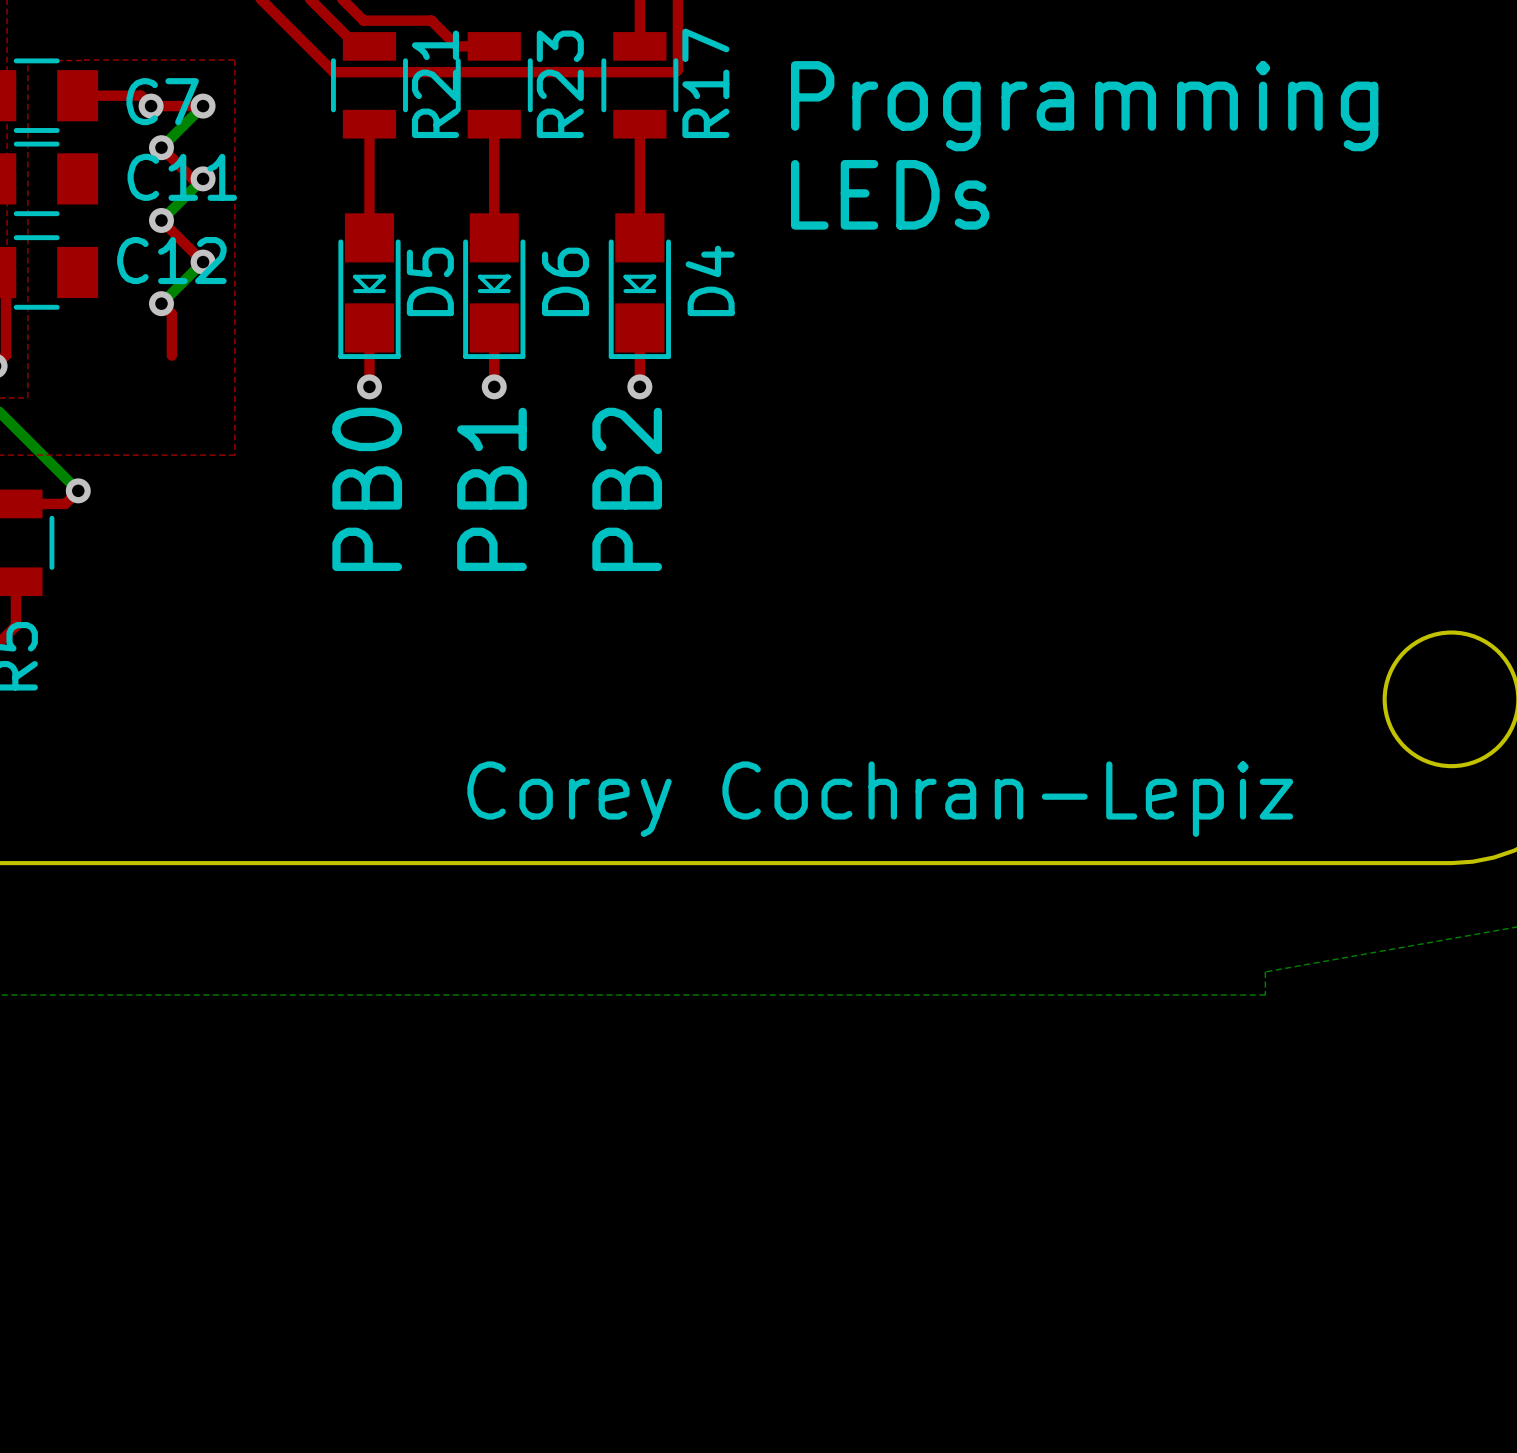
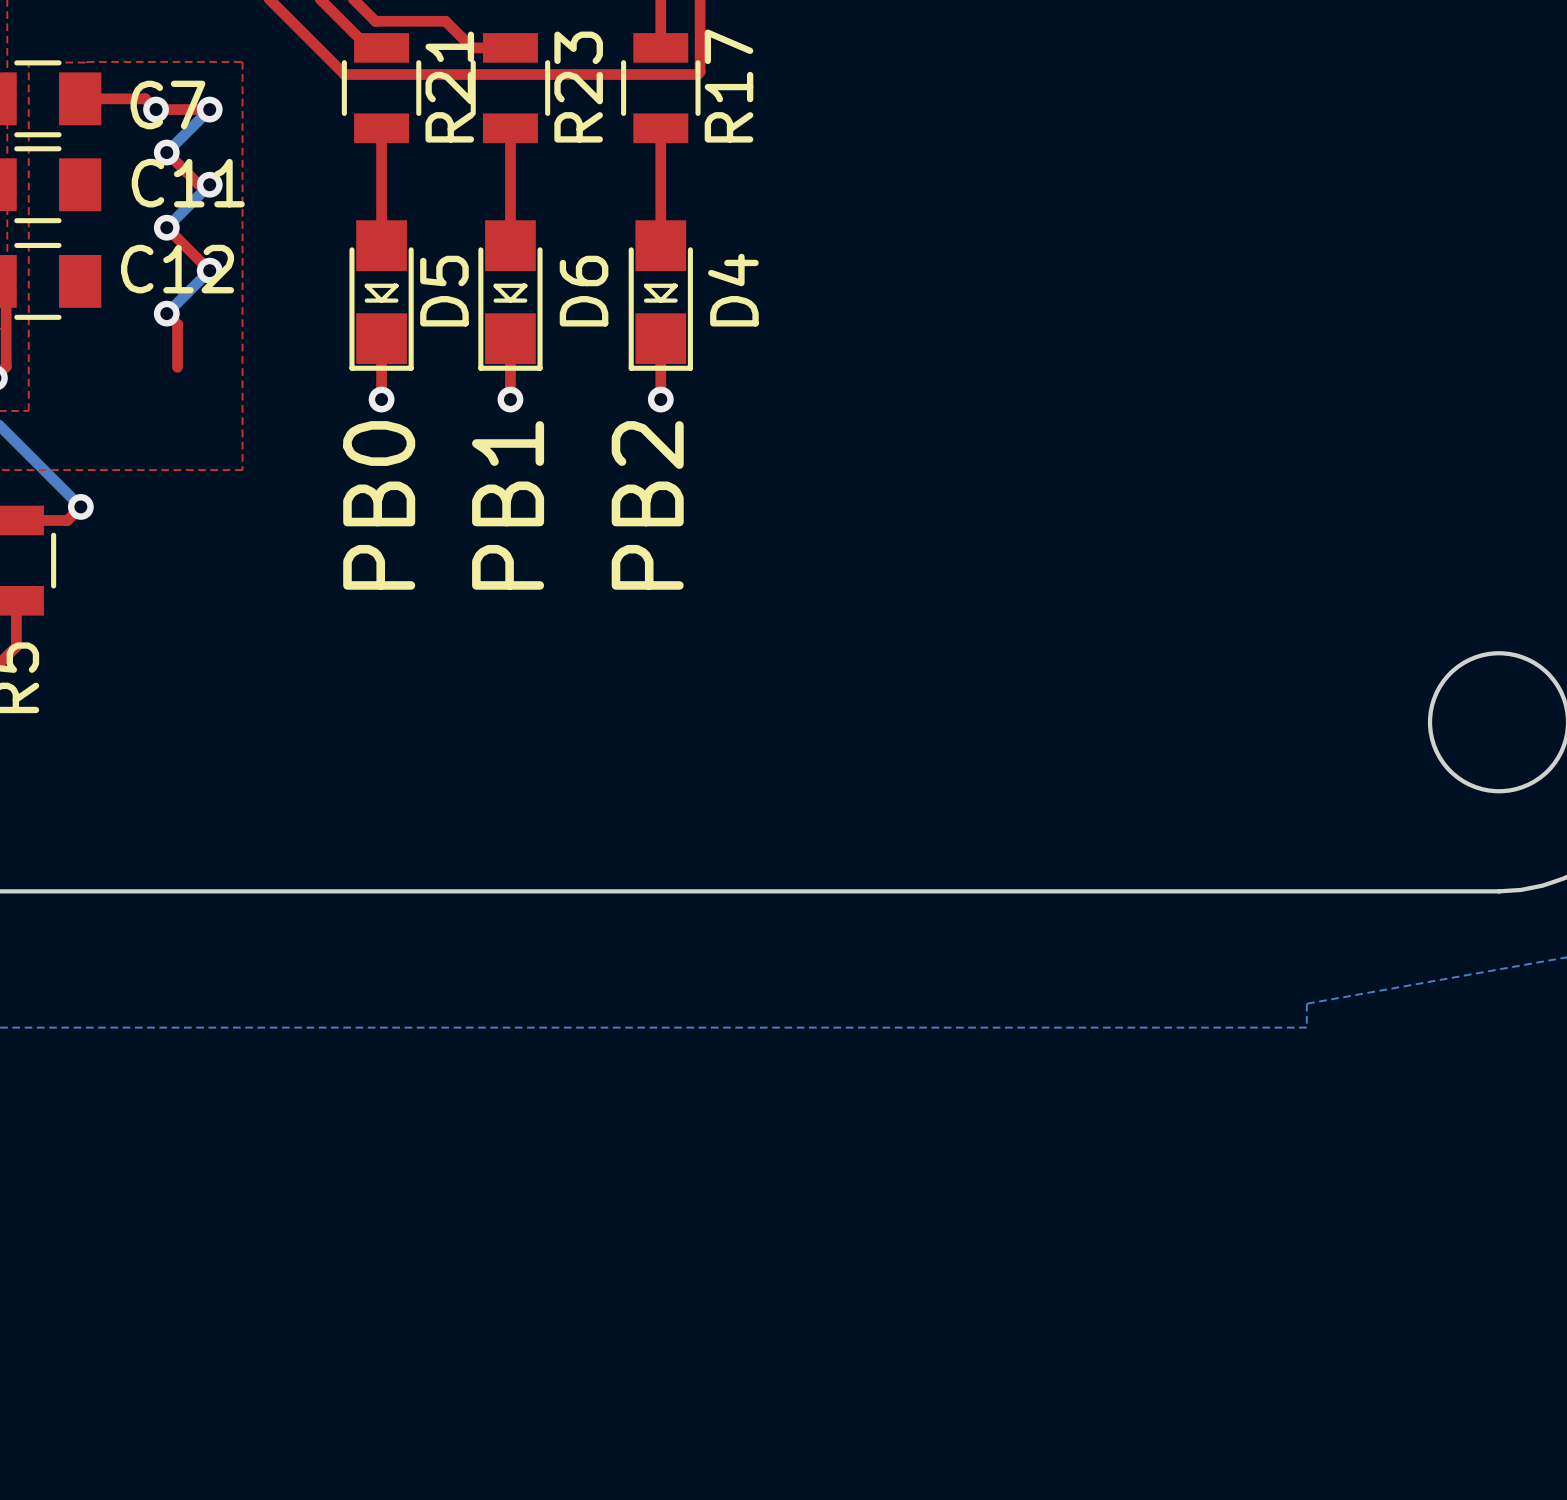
text: Programming (1084, 106) -> none
text: LEDs (890, 194) -> none
text: Corey Cochran-Lepiz (880, 799) -> none

